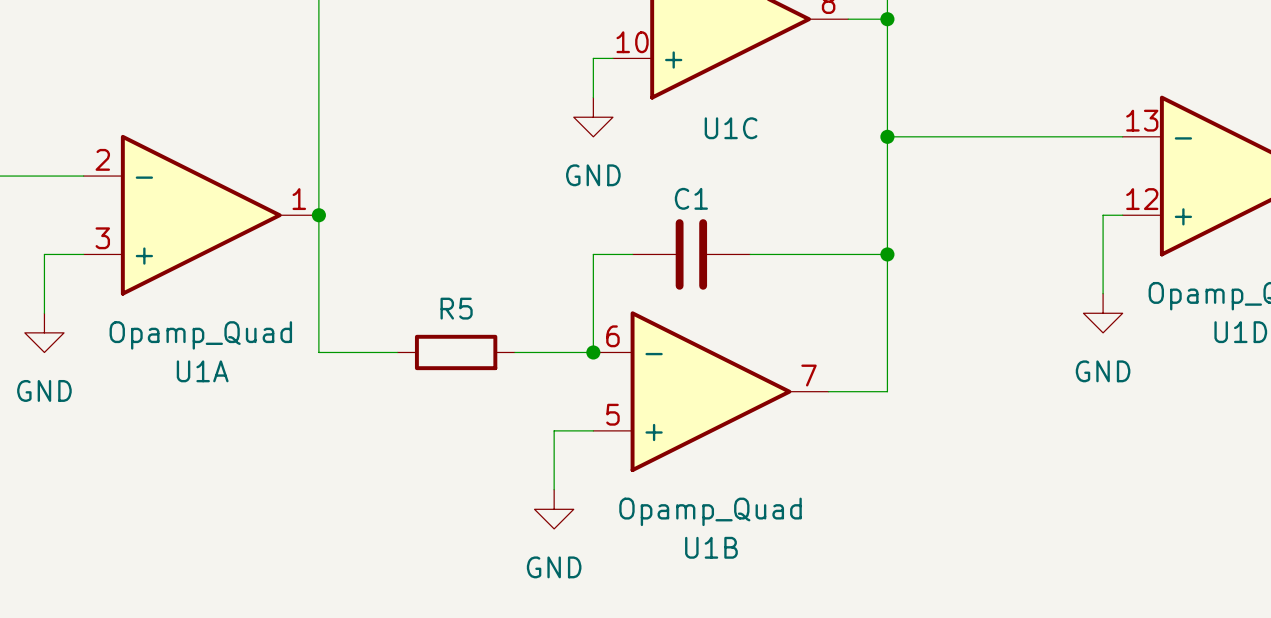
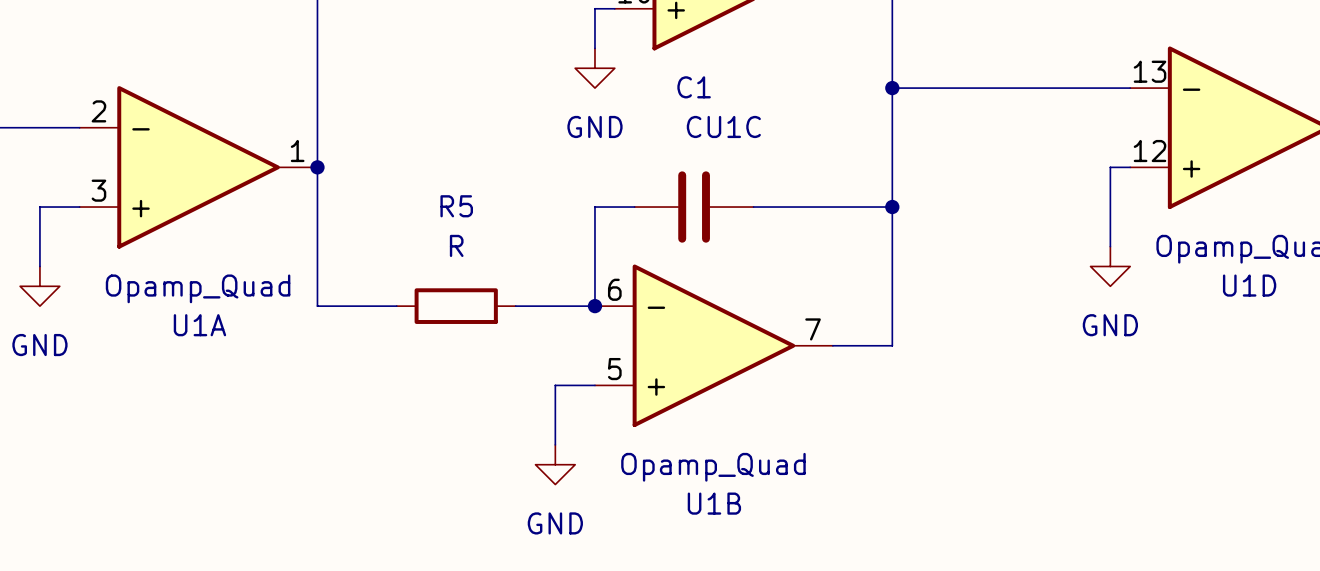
U1C name position: U1C (731, 128) -> U1C (734, 126)
C1 value: none -> C (694, 126)
C1 name position: C1 (691, 198) -> C1 (694, 87)
R5 value: none -> R (456, 245)
R5 name position: R5 (456, 308) -> R5 (456, 206)

